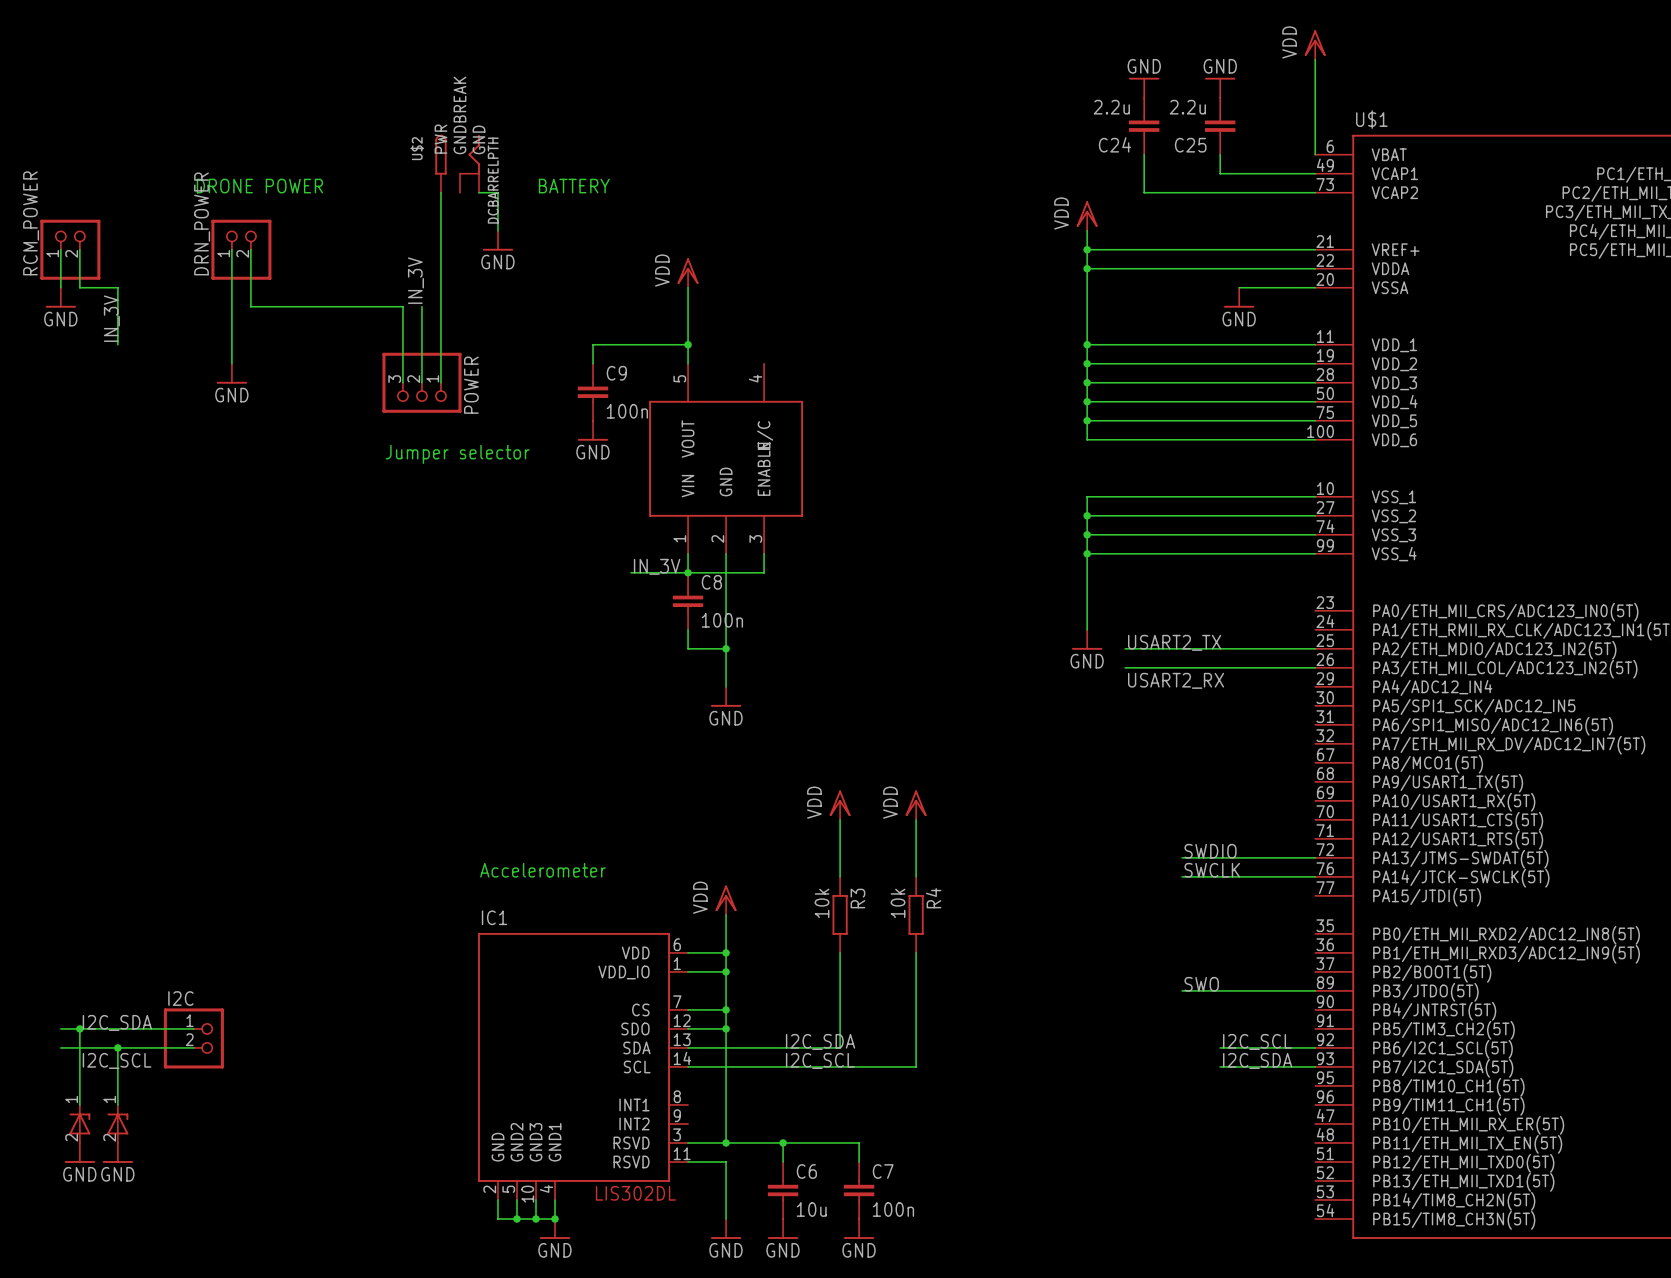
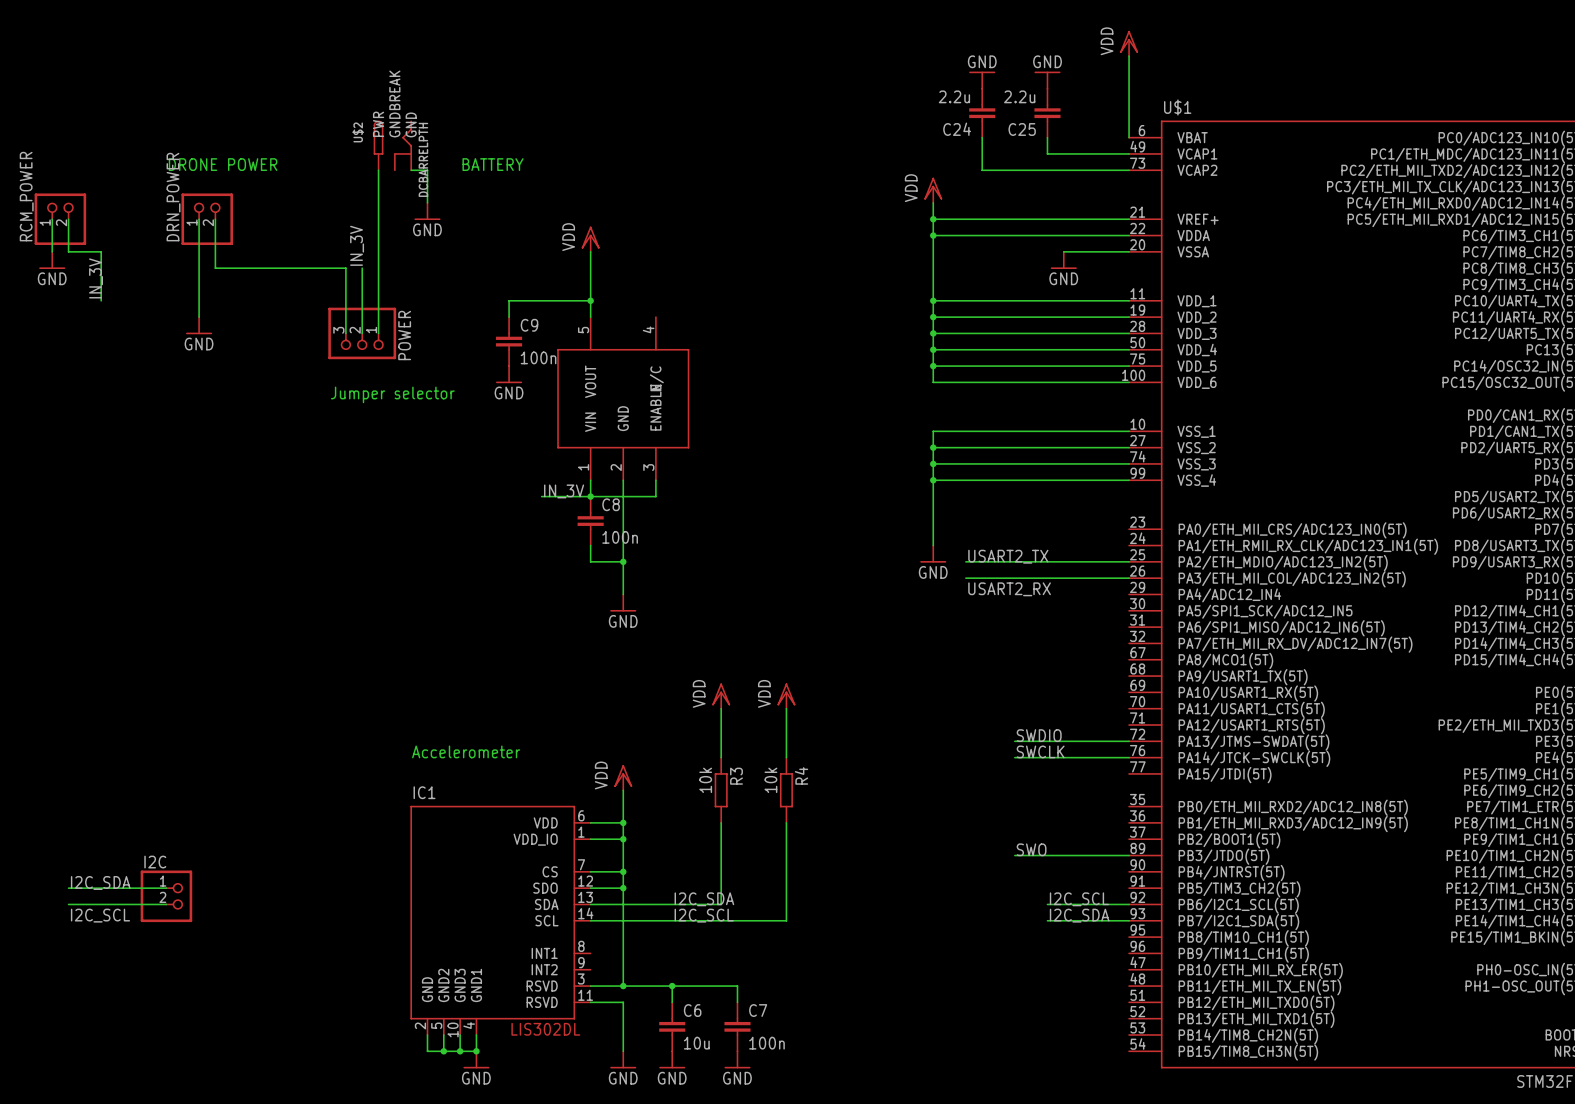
wire: (60, 1028) (79, 1028) (79, 1104) -> none
junction: (79, 1028) -> none
wire: (60, 1047) (79, 1047) -> none
wire: (117, 1047) (117, 1104) -> none
junction: (117, 1047) -> none
part: (79, 1123) -> none
part: (117, 1123) -> none
power symbol: GND (79, 1152) -> none
power symbol: GND (117, 1152) -> none

